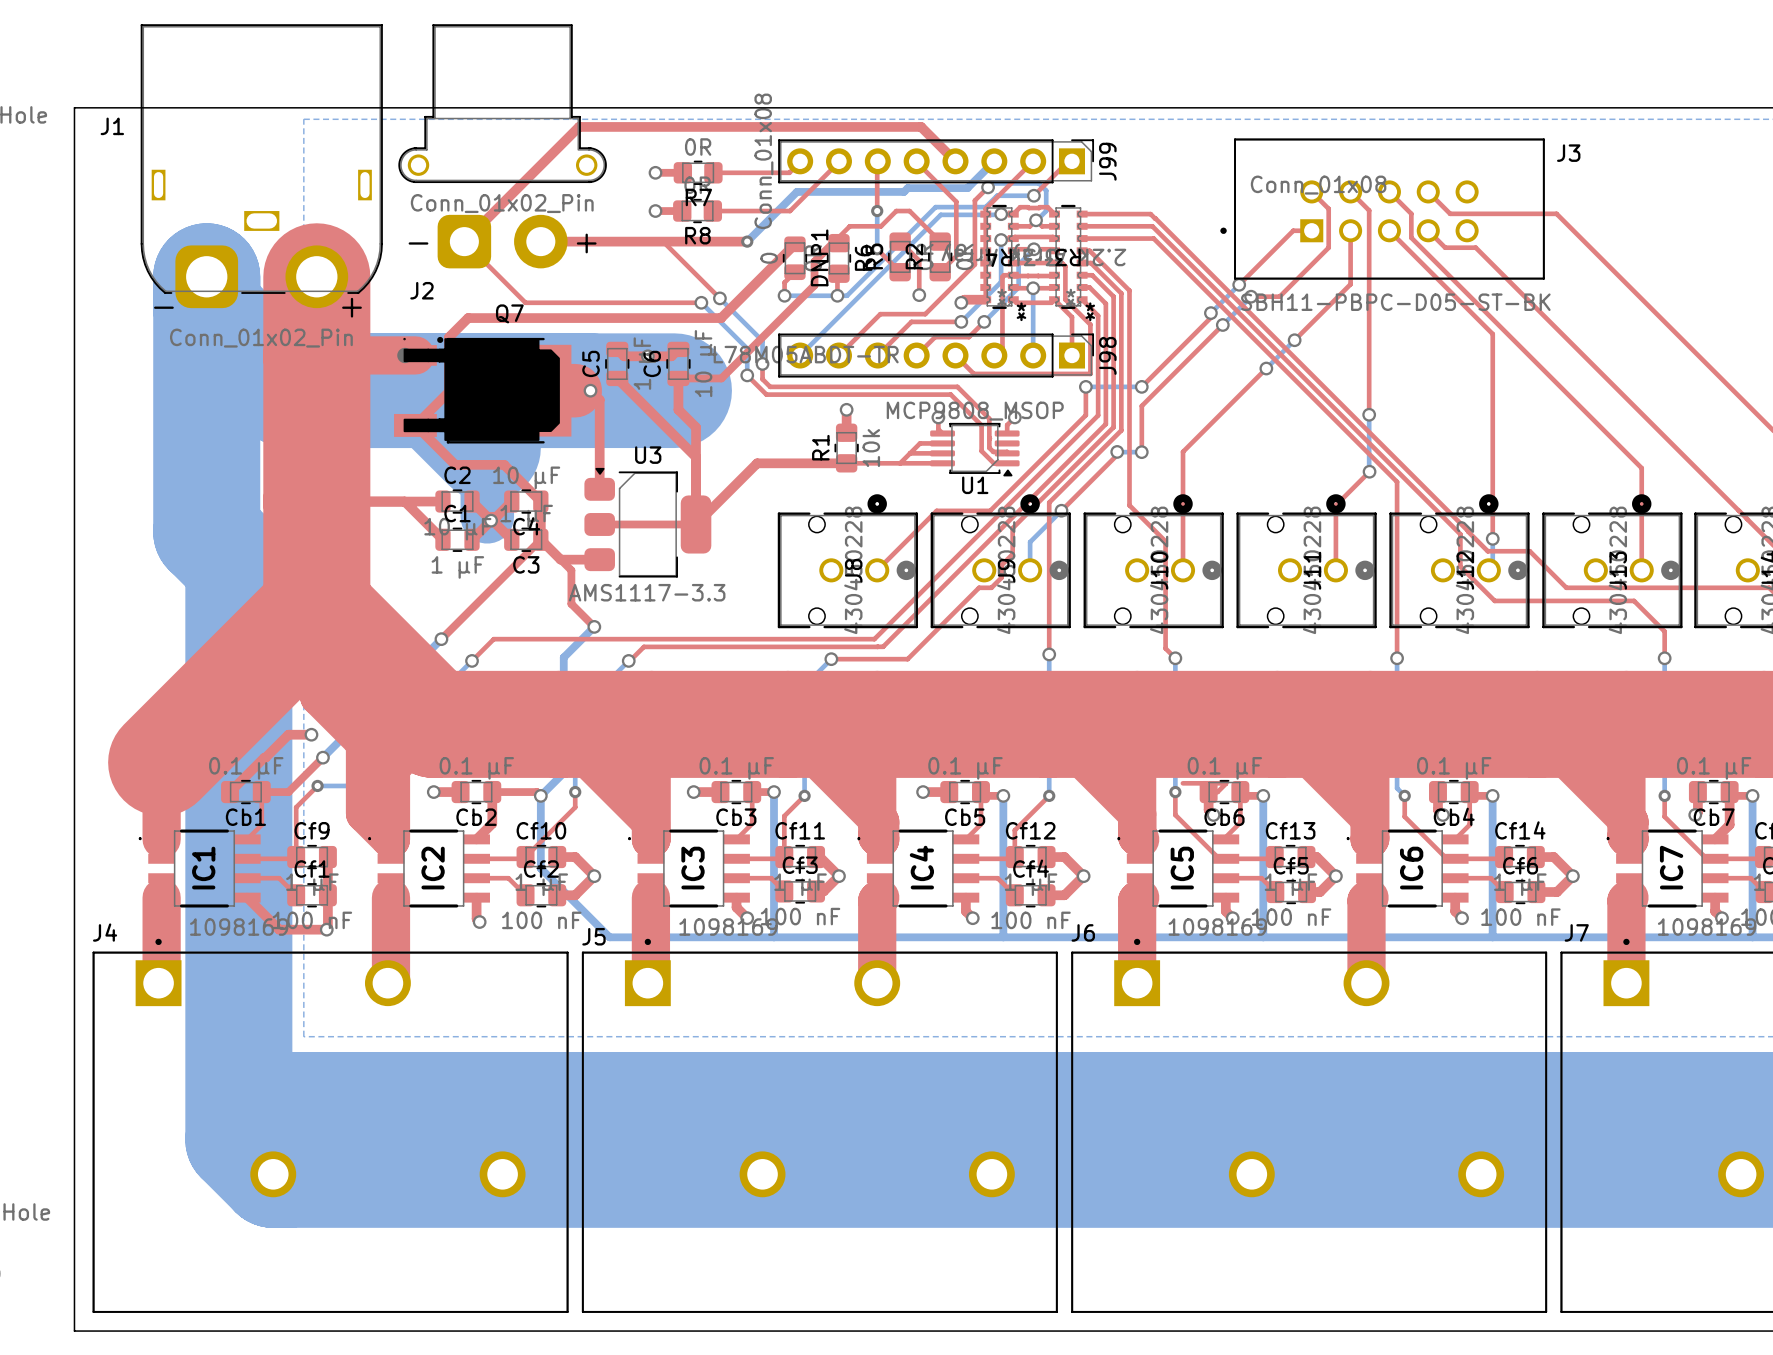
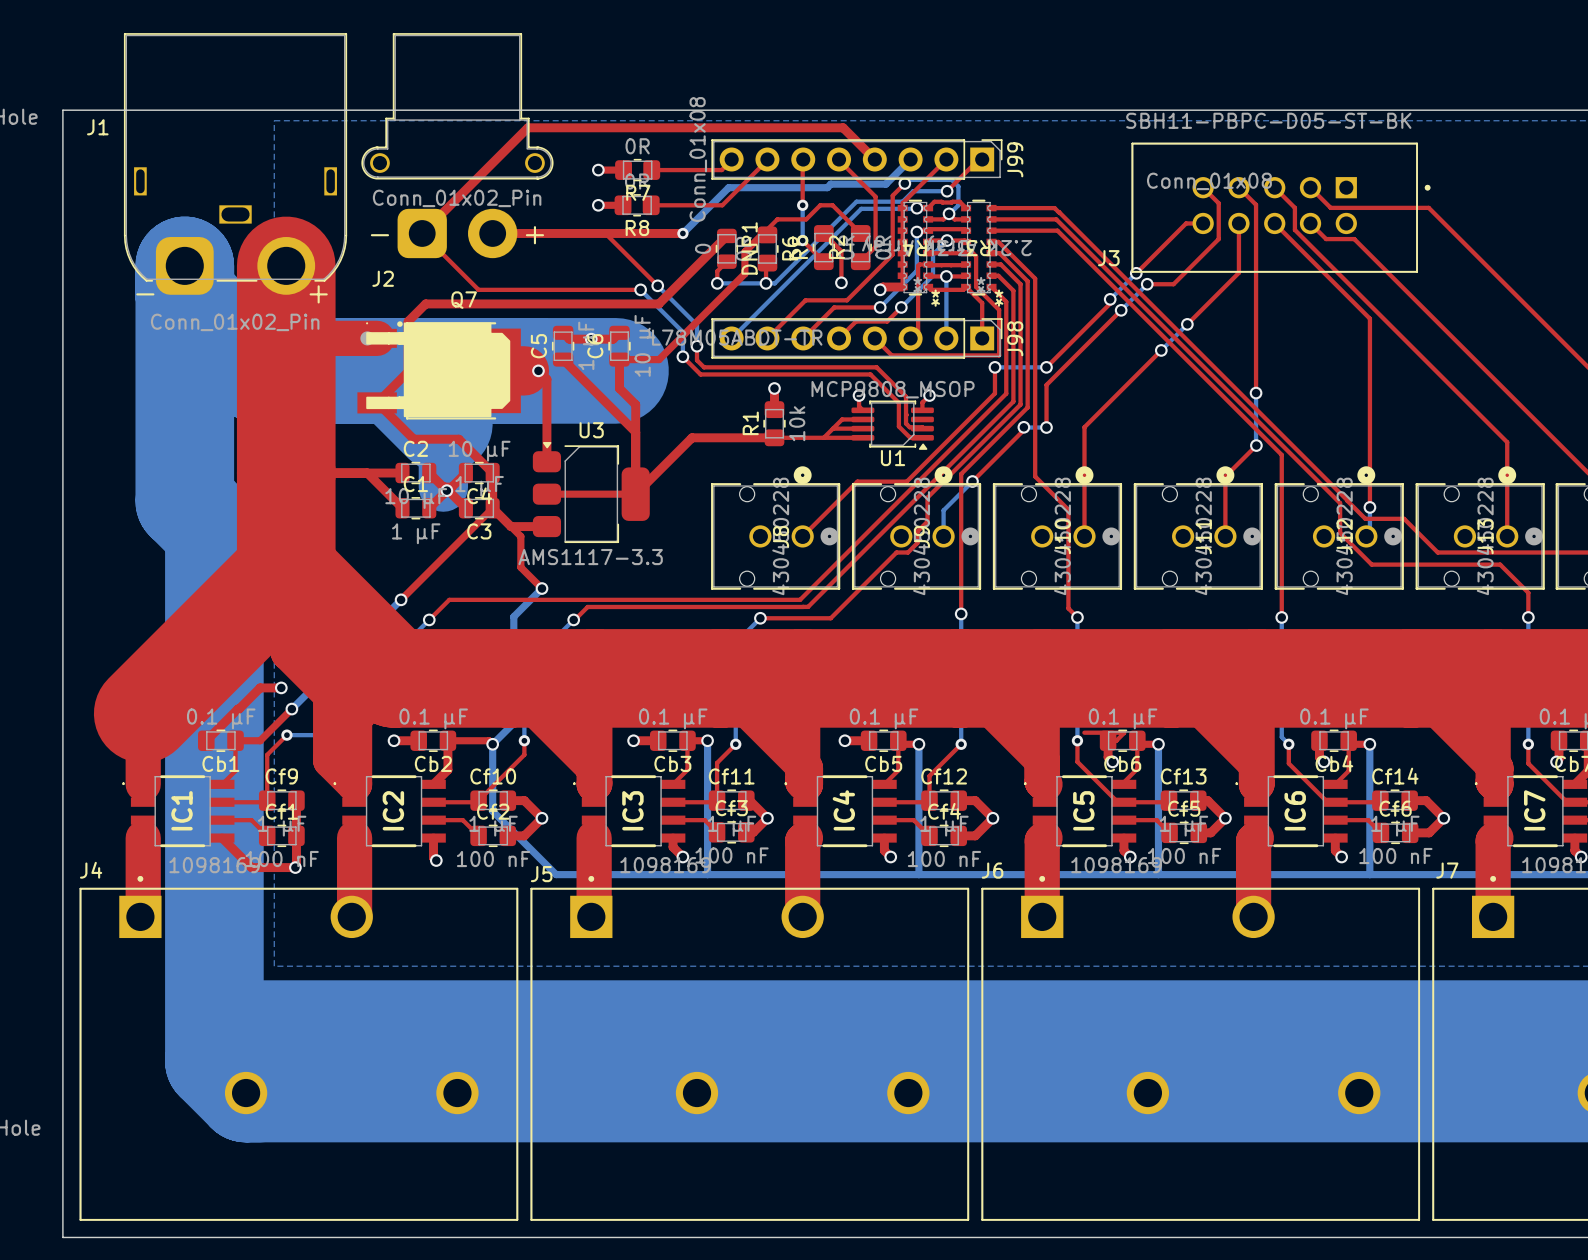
J3 rotation: 0° (1382, 209) -> 180° (1280, 207)

